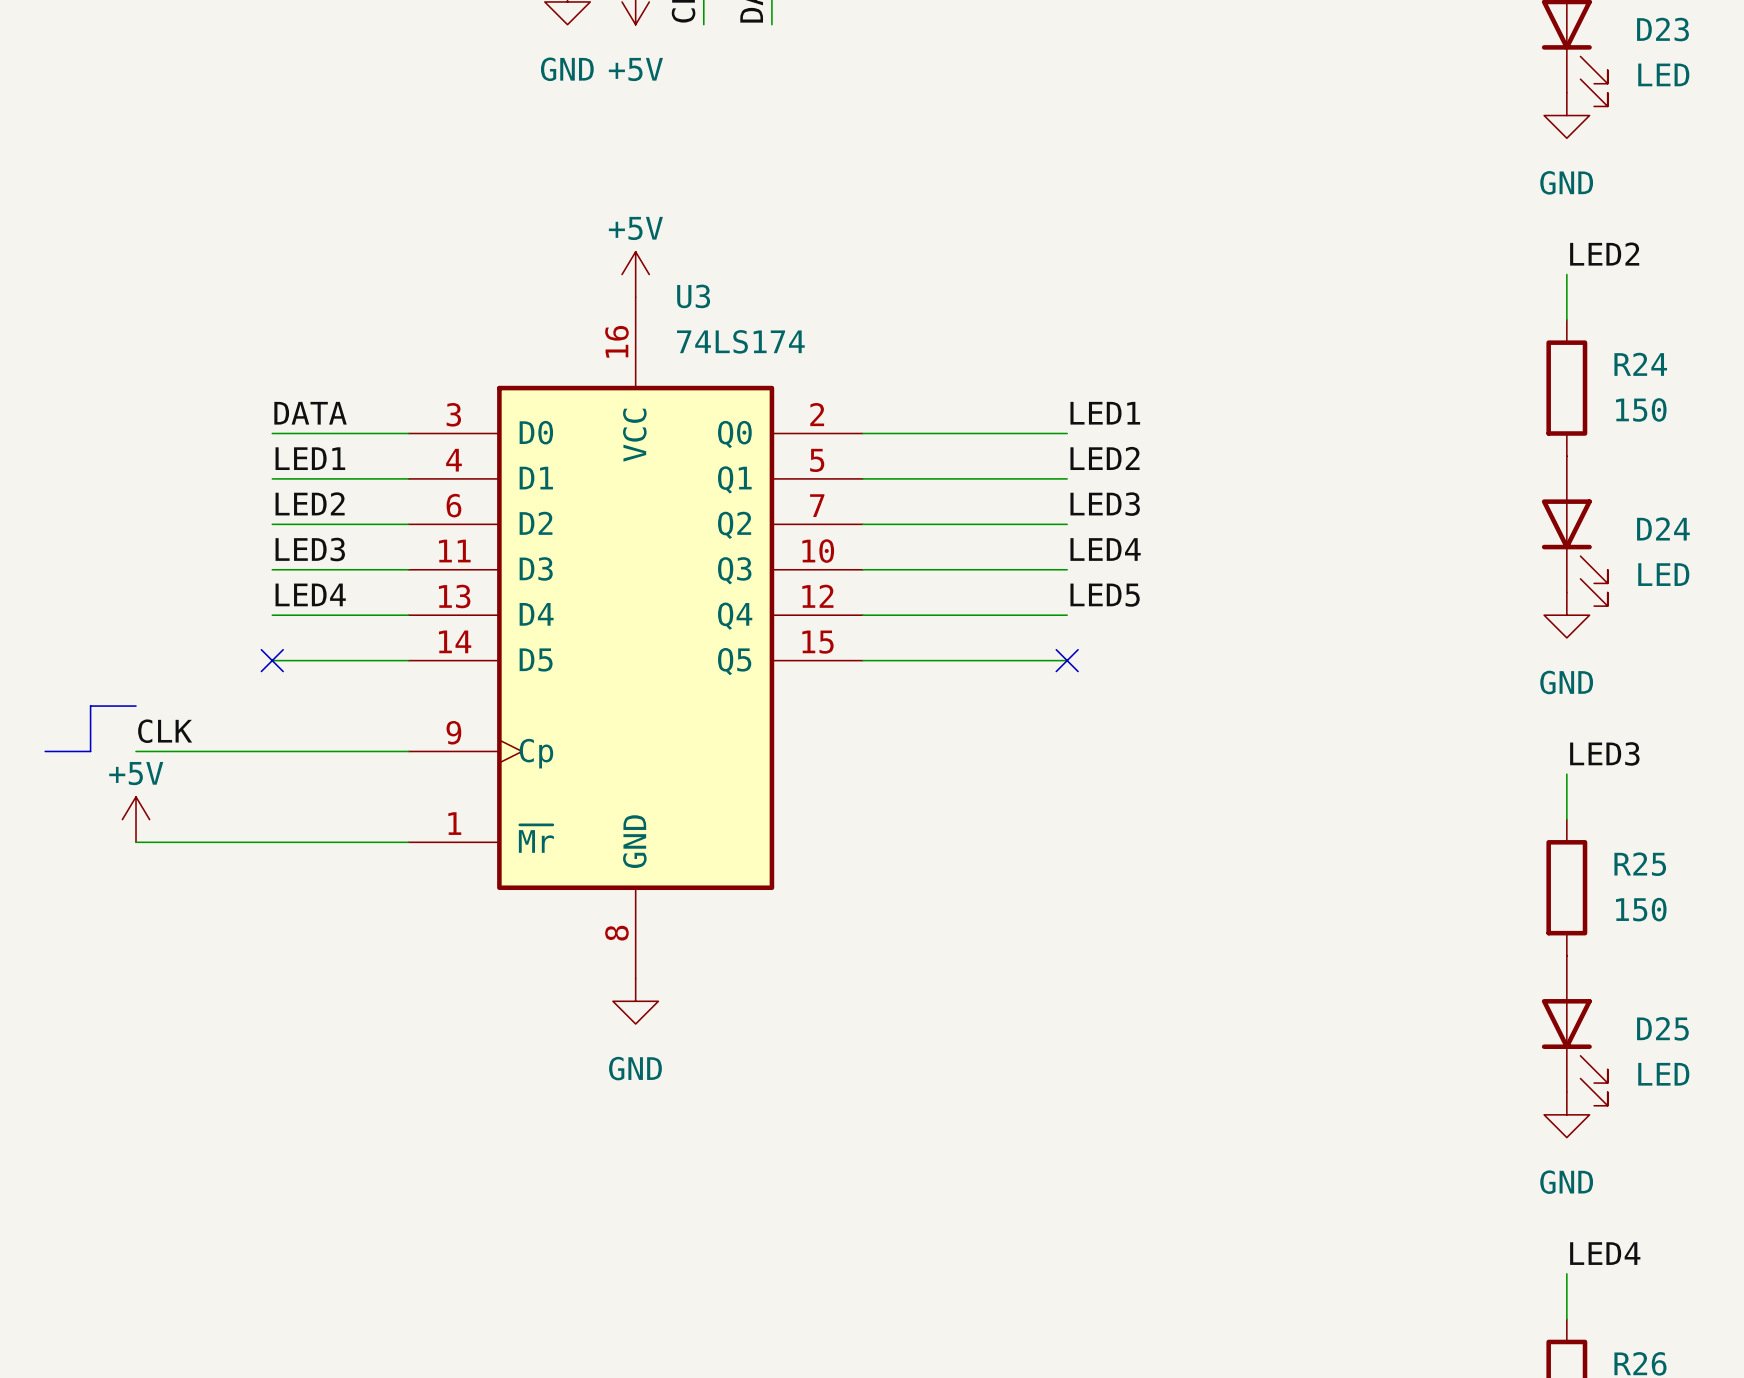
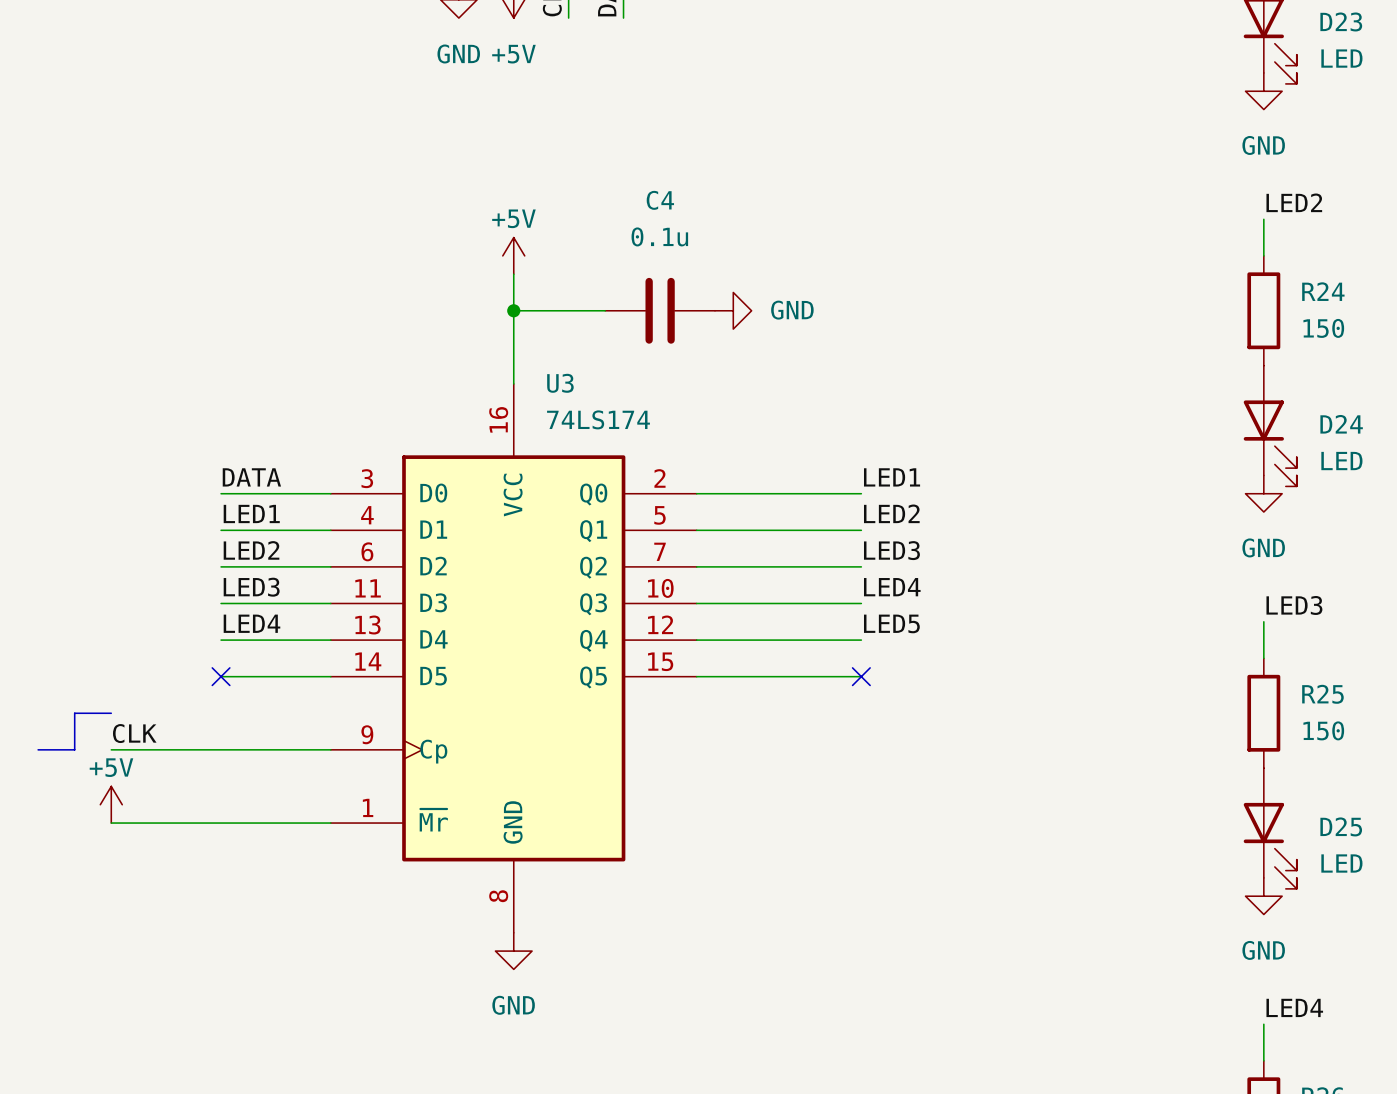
power symbol position: +5V (635, 274) -> +5V (513, 255)
junction: none -> (513, 310)
C4: none -> 0.1u (660, 310)
power symbol: none -> GND (733, 310)
label: DATA (310, 413) -> none
label: LED1 (1105, 413) -> none
wire: (272, 433) (408, 433) -> (221, 566) (330, 566)
wire: (862, 433) (1067, 433) -> (696, 566) (861, 566)
label position: LED1 (310, 458) -> LED1 (251, 513)
label position: LED2 (1105, 458) -> LED2 (891, 513)
wire: (272, 478) (408, 478) -> none
wire: (862, 478) (1067, 478) -> (696, 603) (861, 603)
label position: LED2 (310, 503) -> LED2 (251, 550)
label position: LED3 (1105, 504) -> LED3 (891, 550)
wire: (272, 524) (408, 524) -> (221, 640) (330, 640)
wire: (862, 524) (1067, 524) -> (696, 640) (861, 640)
label position: LED3 (310, 549) -> LED3 (251, 587)
label position: LED4 (1105, 549) -> LED4 (892, 587)
wire: (272, 569) (408, 569) -> none
wire: (862, 569) (1067, 569) -> (696, 676) (861, 676)
label: LED4 (310, 594) -> DATA (251, 477)
label: LED5 (1105, 595) -> LED1 (892, 477)
U3 position: (635, 637) -> (513, 658)
no-connect mark: (272, 660) -> none
no-connect mark: (1067, 660) -> none
line: (136, 706) (90, 706) (90, 751) (45, 751) -> (111, 713) (74, 713) (74, 749) (38, 749)
label position: CLK (165, 731) -> CLK (134, 733)
wire: (136, 751) (272, 751) -> none
label: none -> LED4 (251, 623)
label: none -> LED5 (891, 623)
power symbol position: +5V (136, 819) -> +5V (111, 804)
wire: (136, 842) (272, 842) -> none
no-connect mark: none -> (221, 676)
no-connect mark: none -> (861, 676)
wire: none -> (111, 749) (330, 749)
power symbol position: GND (635, 1001) -> GND (513, 951)
wire: none -> (111, 823) (330, 823)

